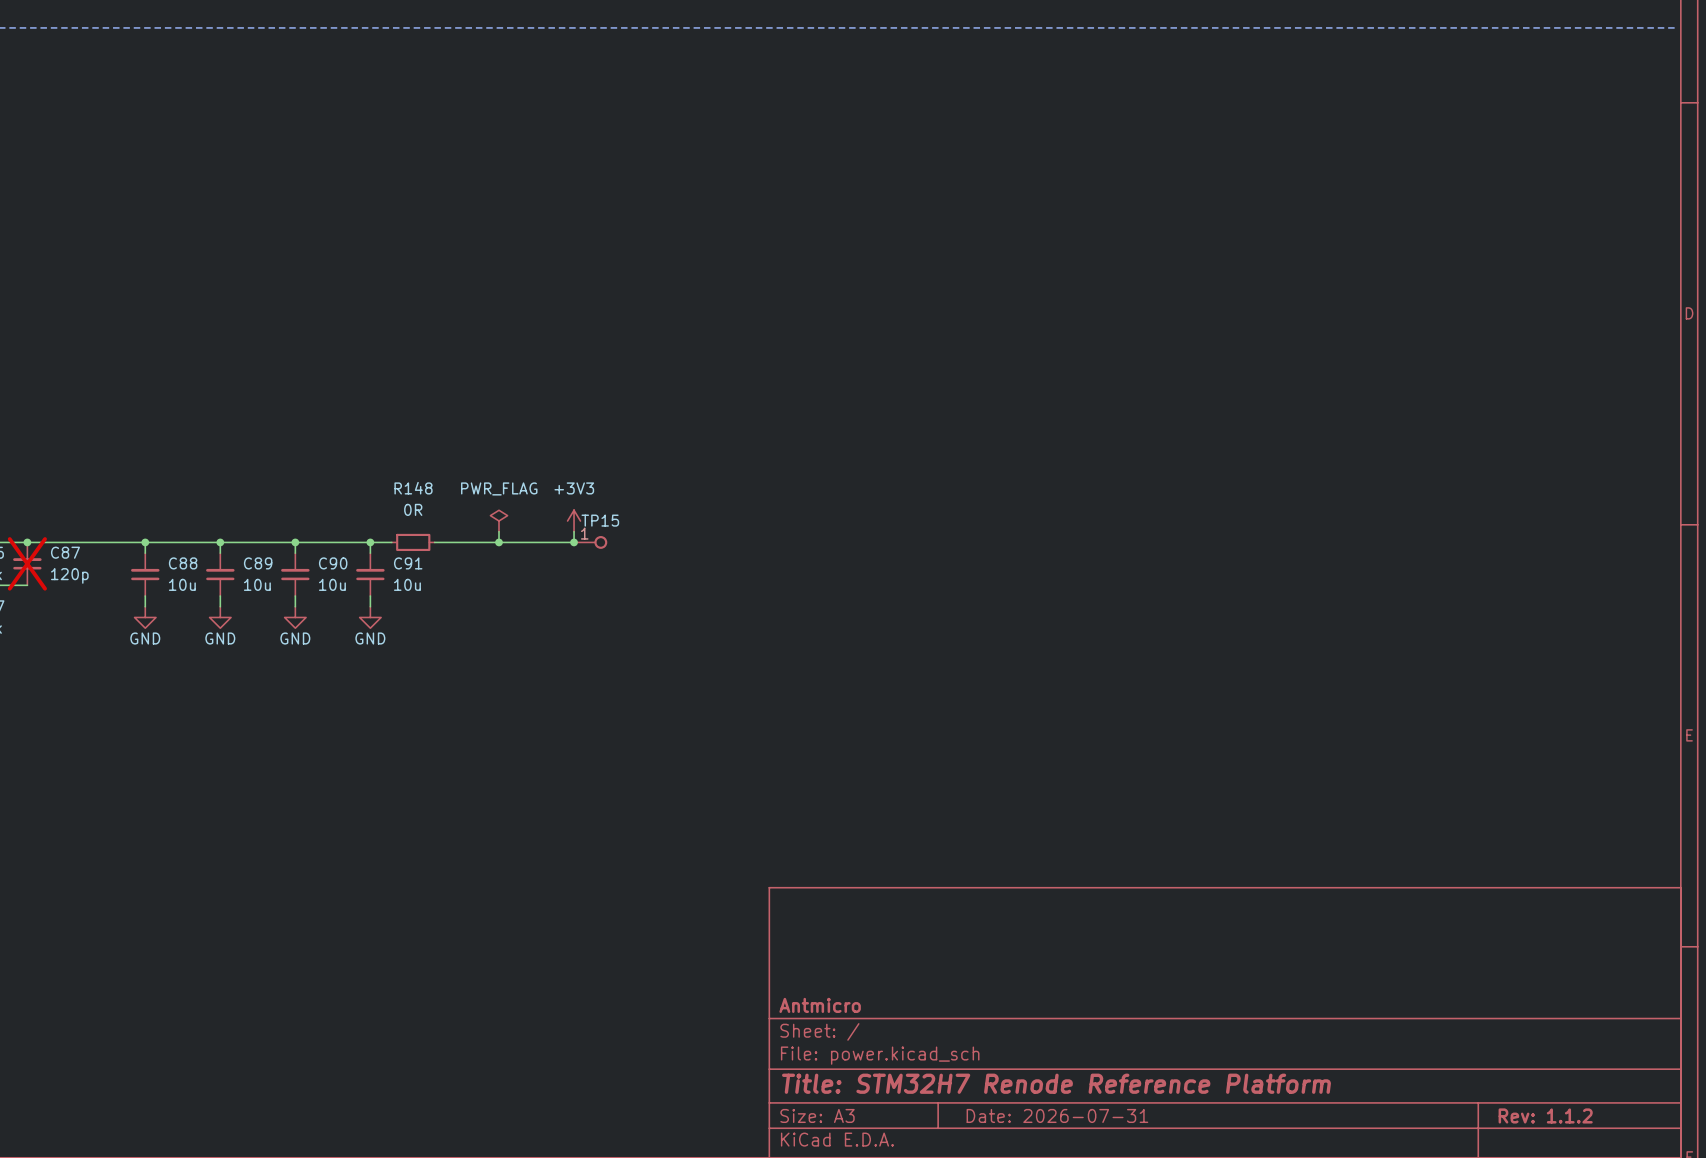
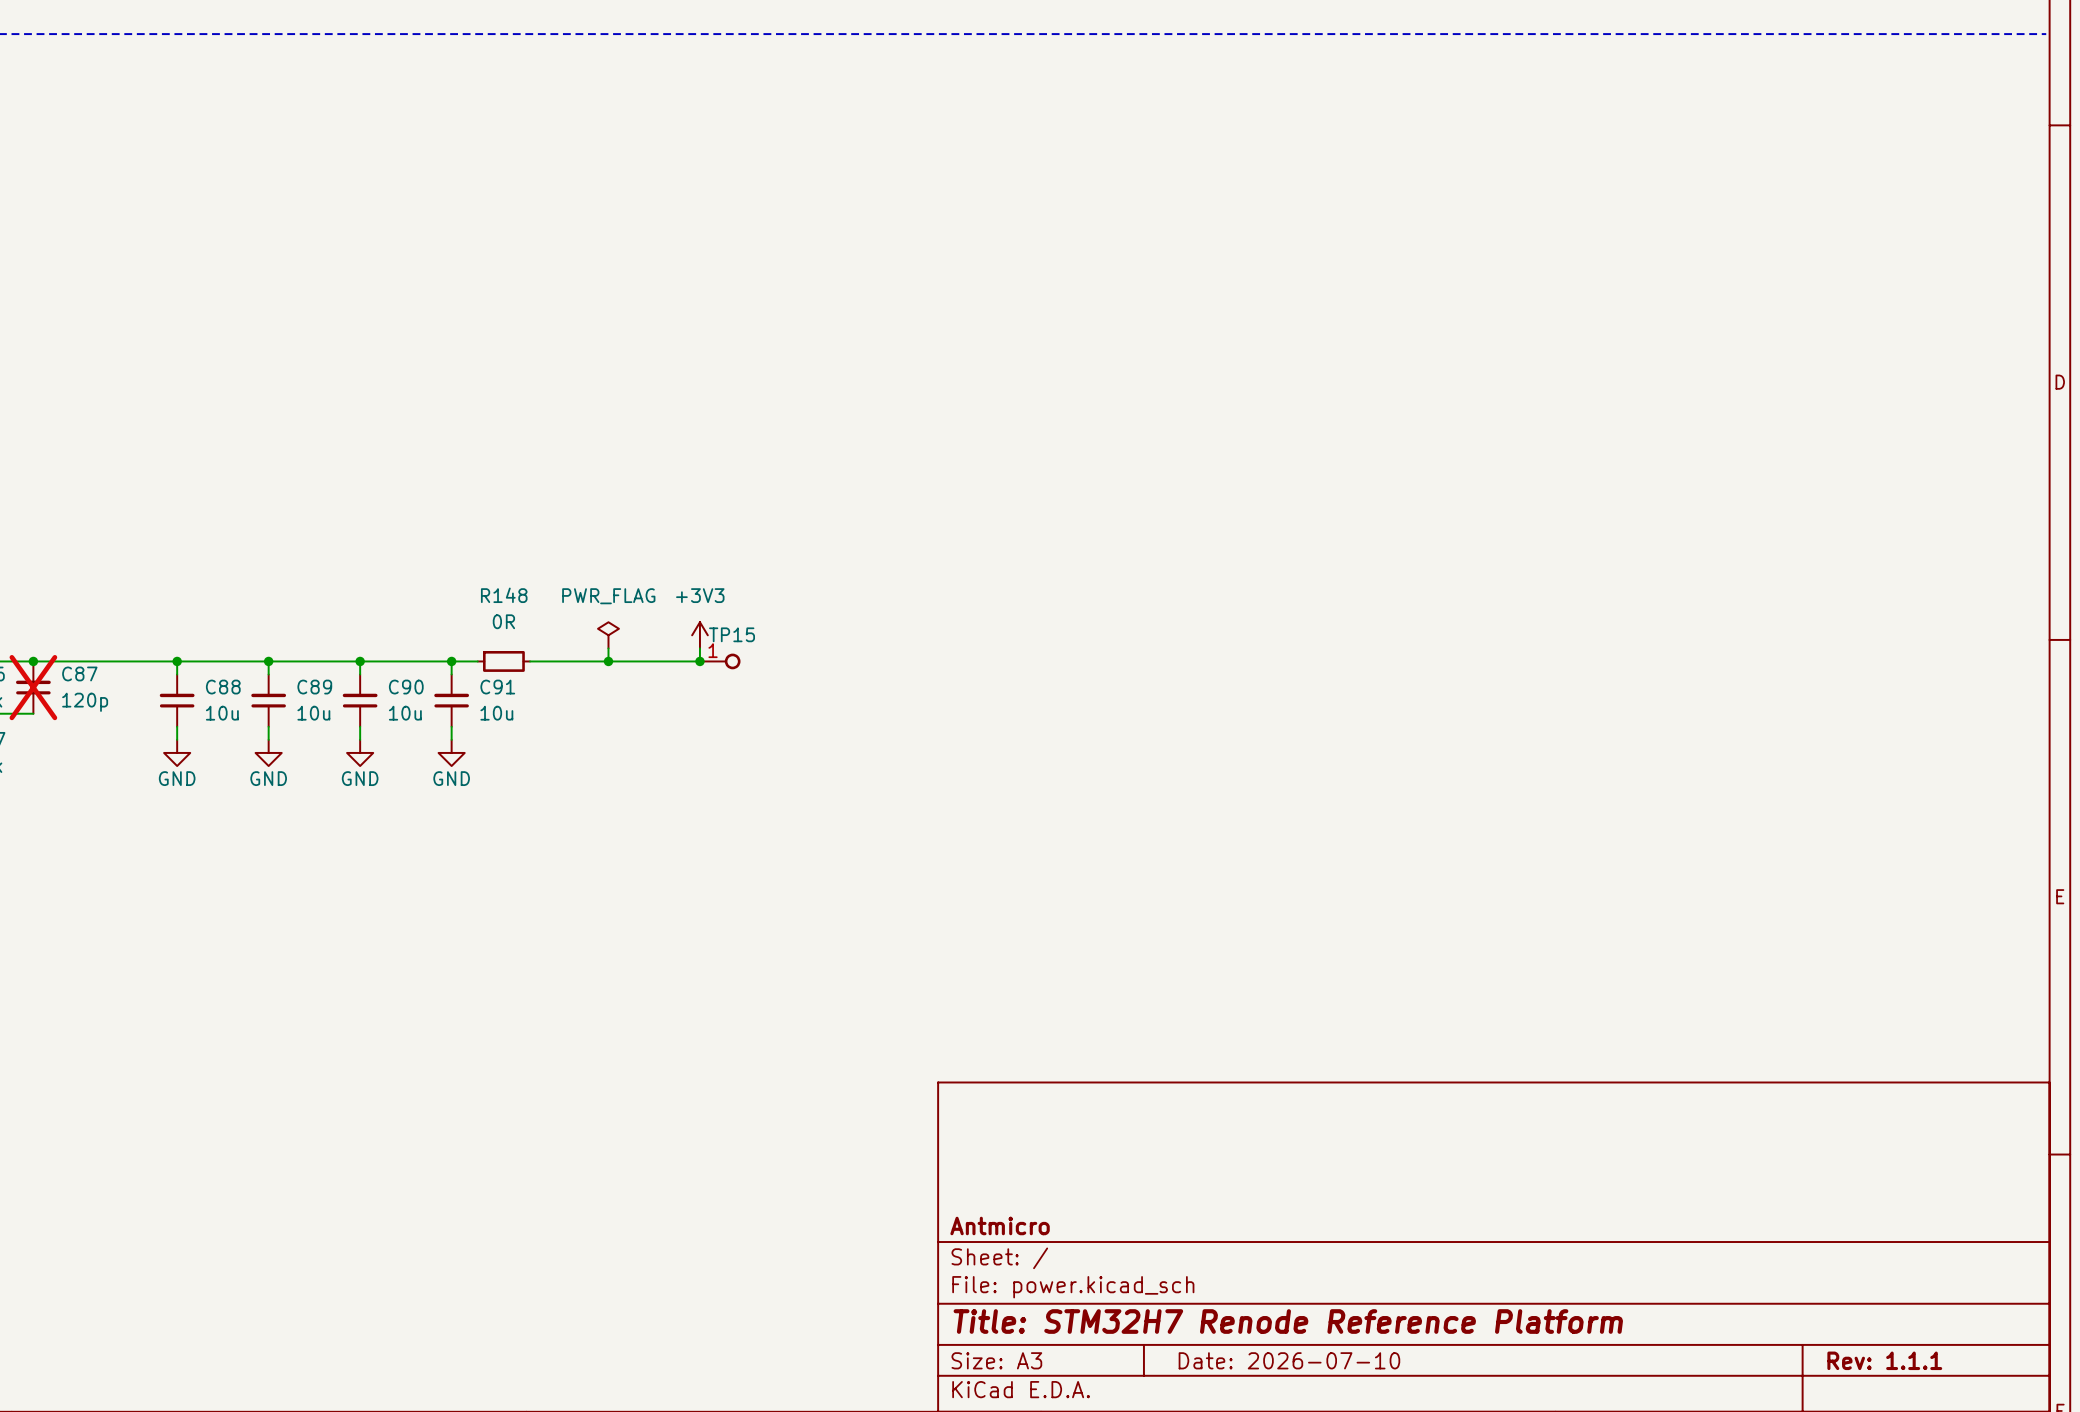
title block: Date: 2026-07-31 (1057, 1115) -> Date: 2026-07-10 (1289, 1360)
title block: Rev: 1.1.2 (1545, 1115) -> Rev: 1.1.1 (1884, 1360)

